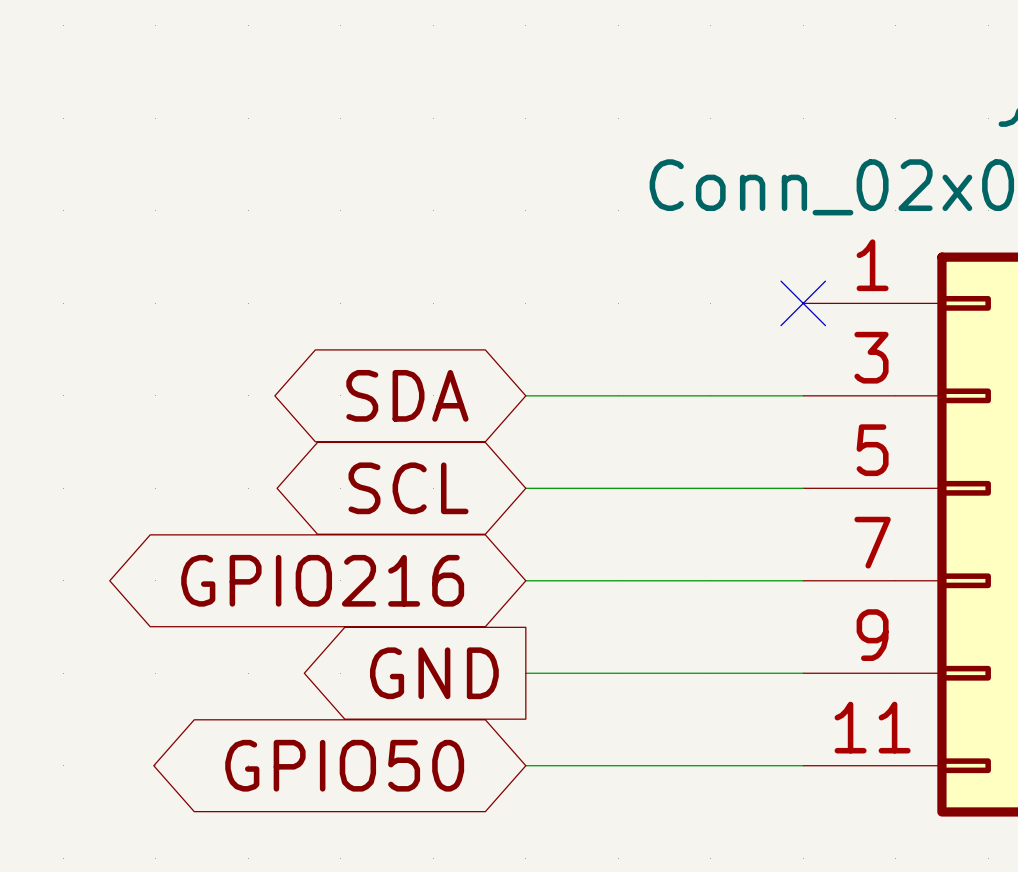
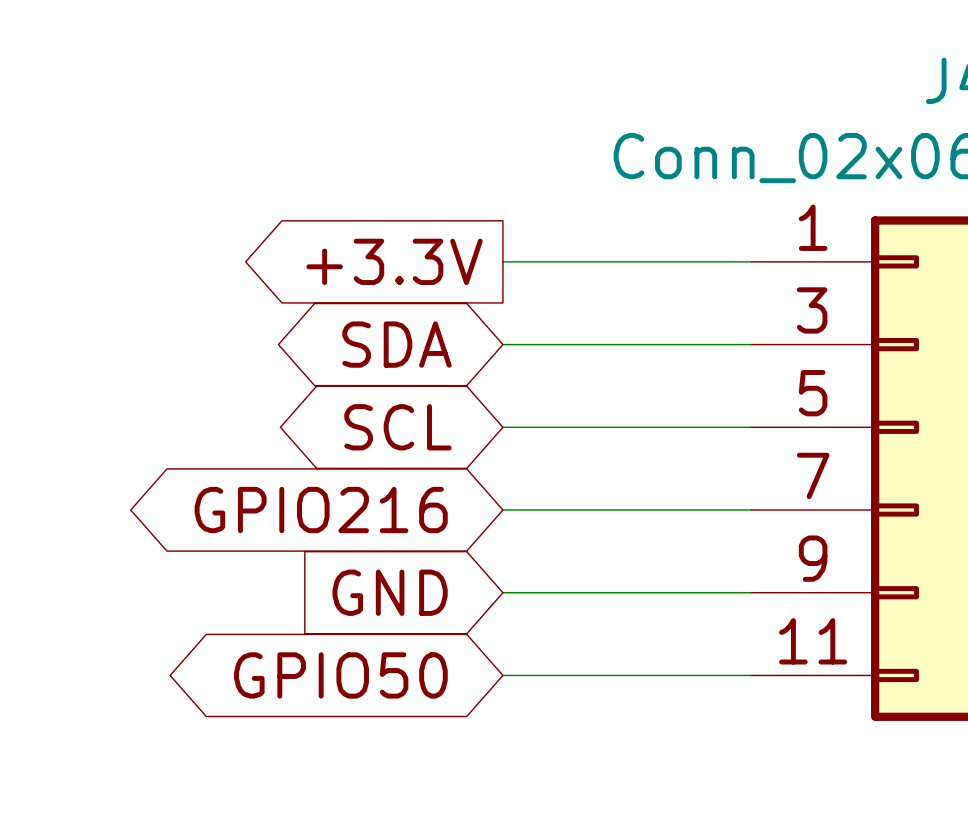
global label: none -> +3.3V (394, 261)
wire: none -> (502, 261) (751, 261)
no-connect mark: (803, 303) -> none
global label shape: output (434, 673) -> input (390, 592)

